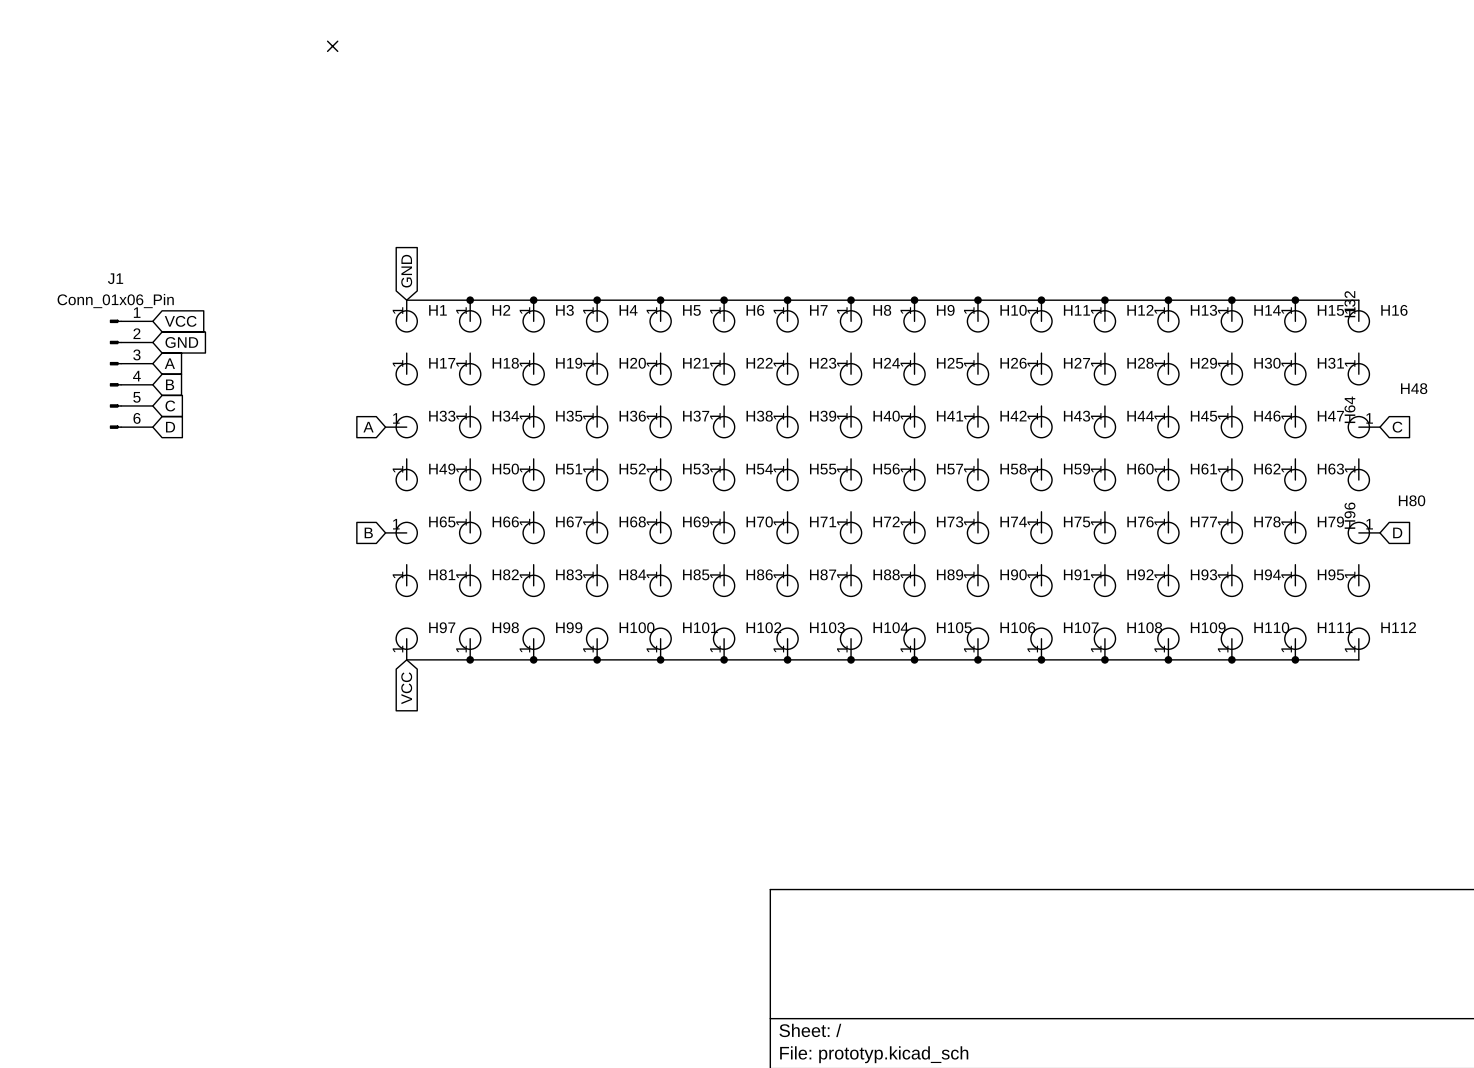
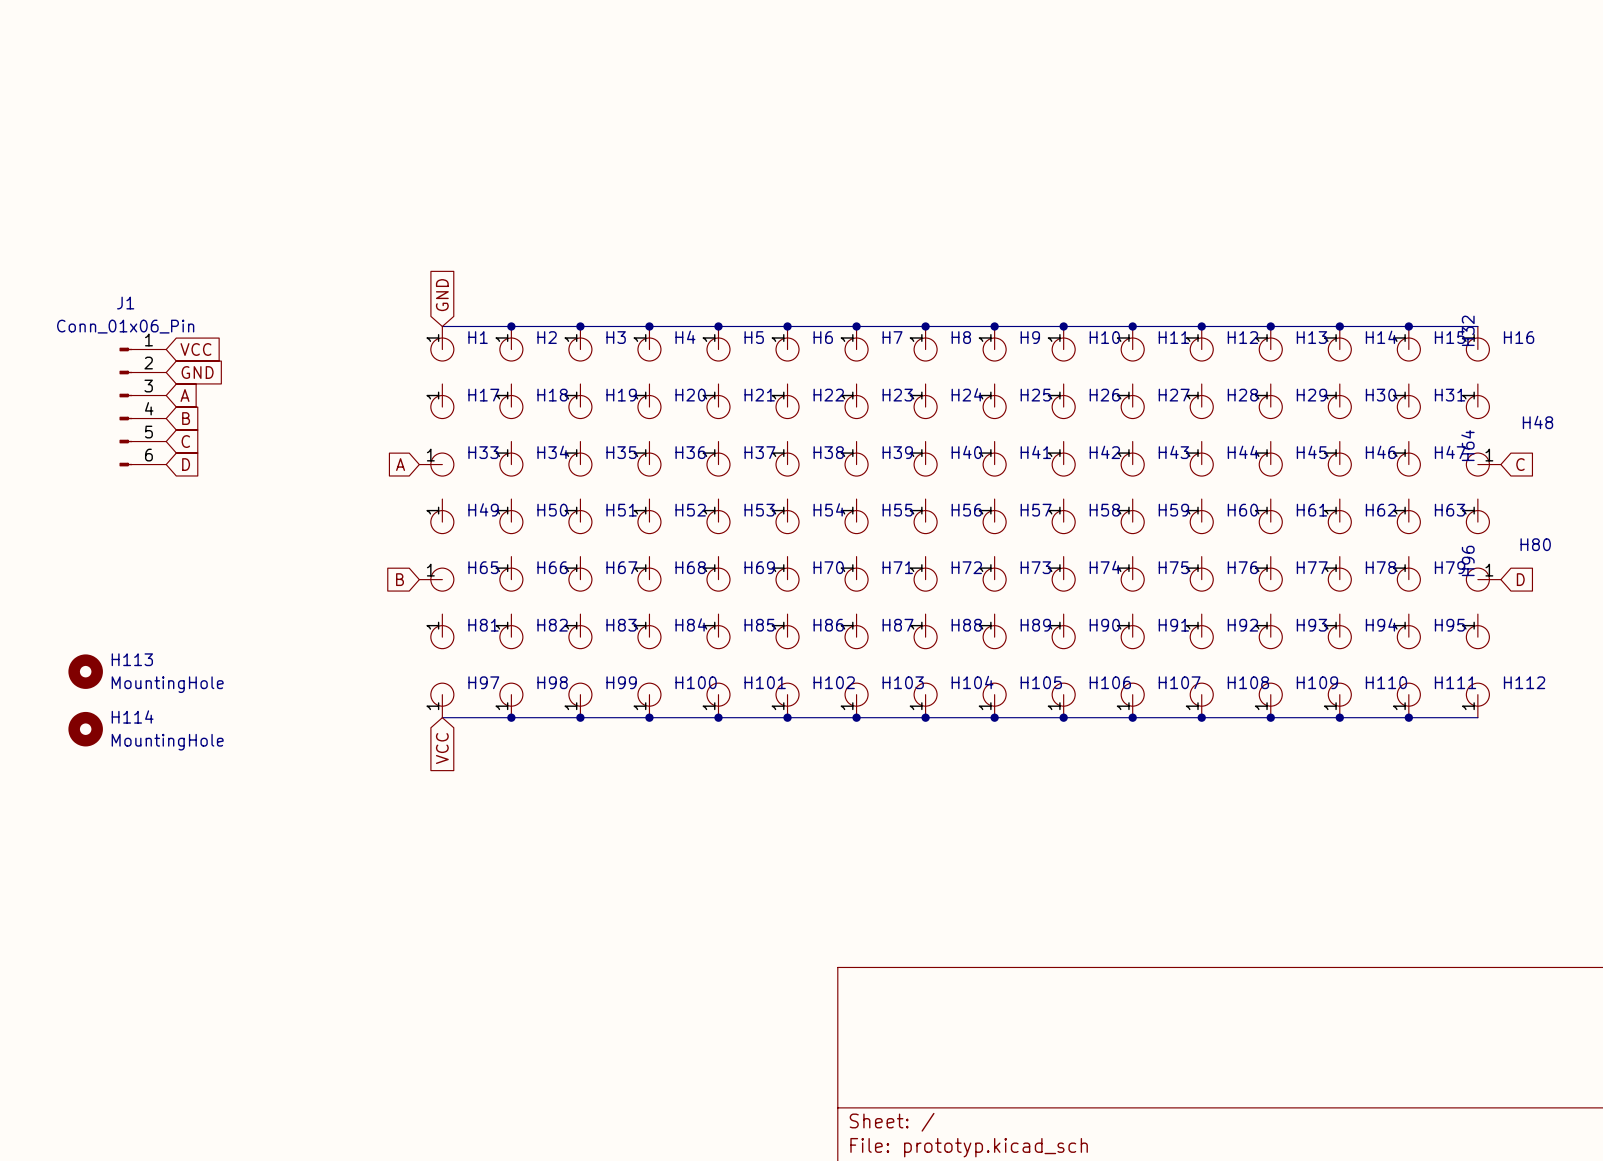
no-connect mark: (332, 46) -> none
H113: none -> MountingHole (85, 671)
H114: none -> MountingHole (85, 729)

